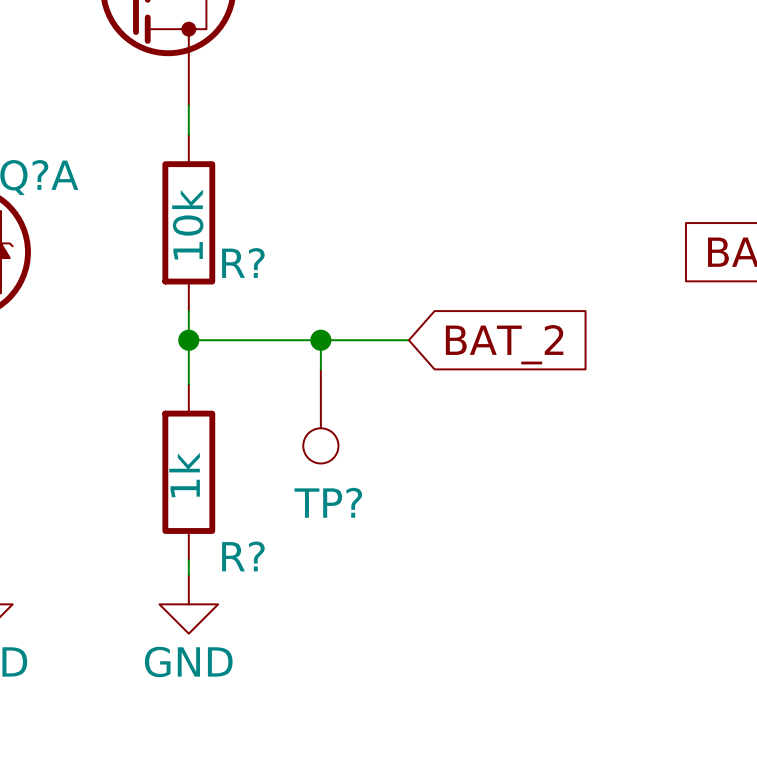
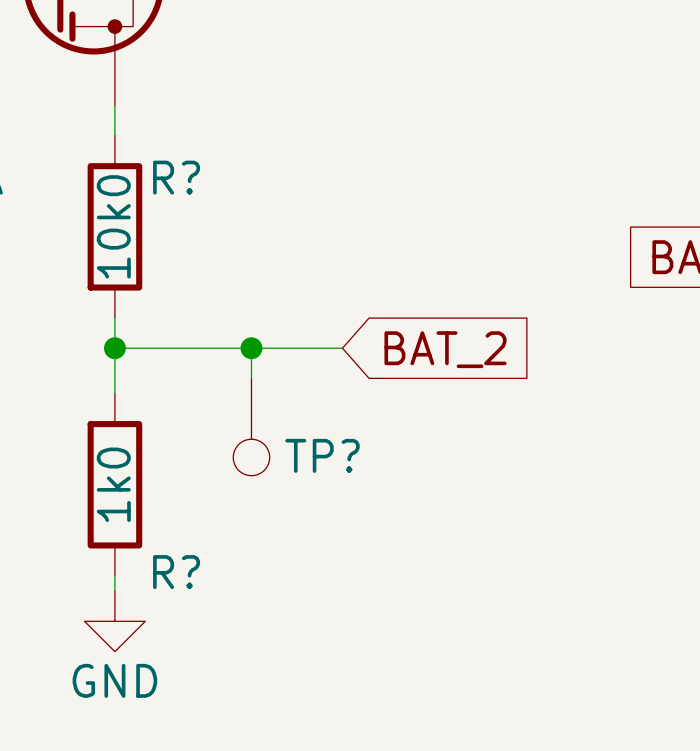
R? text: 10k (187, 224) -> 10k0 (113, 226)
R? name position: R? (243, 263) -> R? (176, 177)
R? text: 1k (184, 475) -> 1k0 (113, 484)
TP? name position: TP? (328, 502) -> TP? (322, 455)

